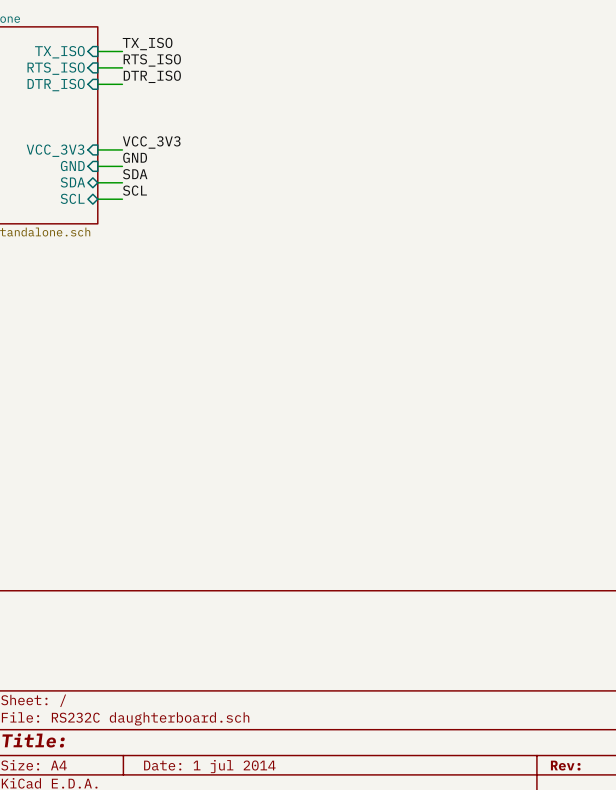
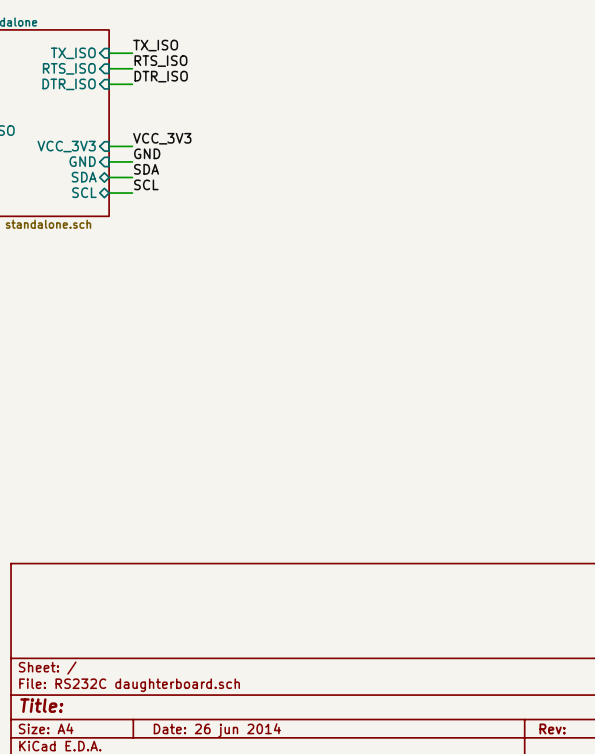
title block: Date: 1 jul 2014 (209, 766) -> Date: 26 jun 2014 (217, 730)

